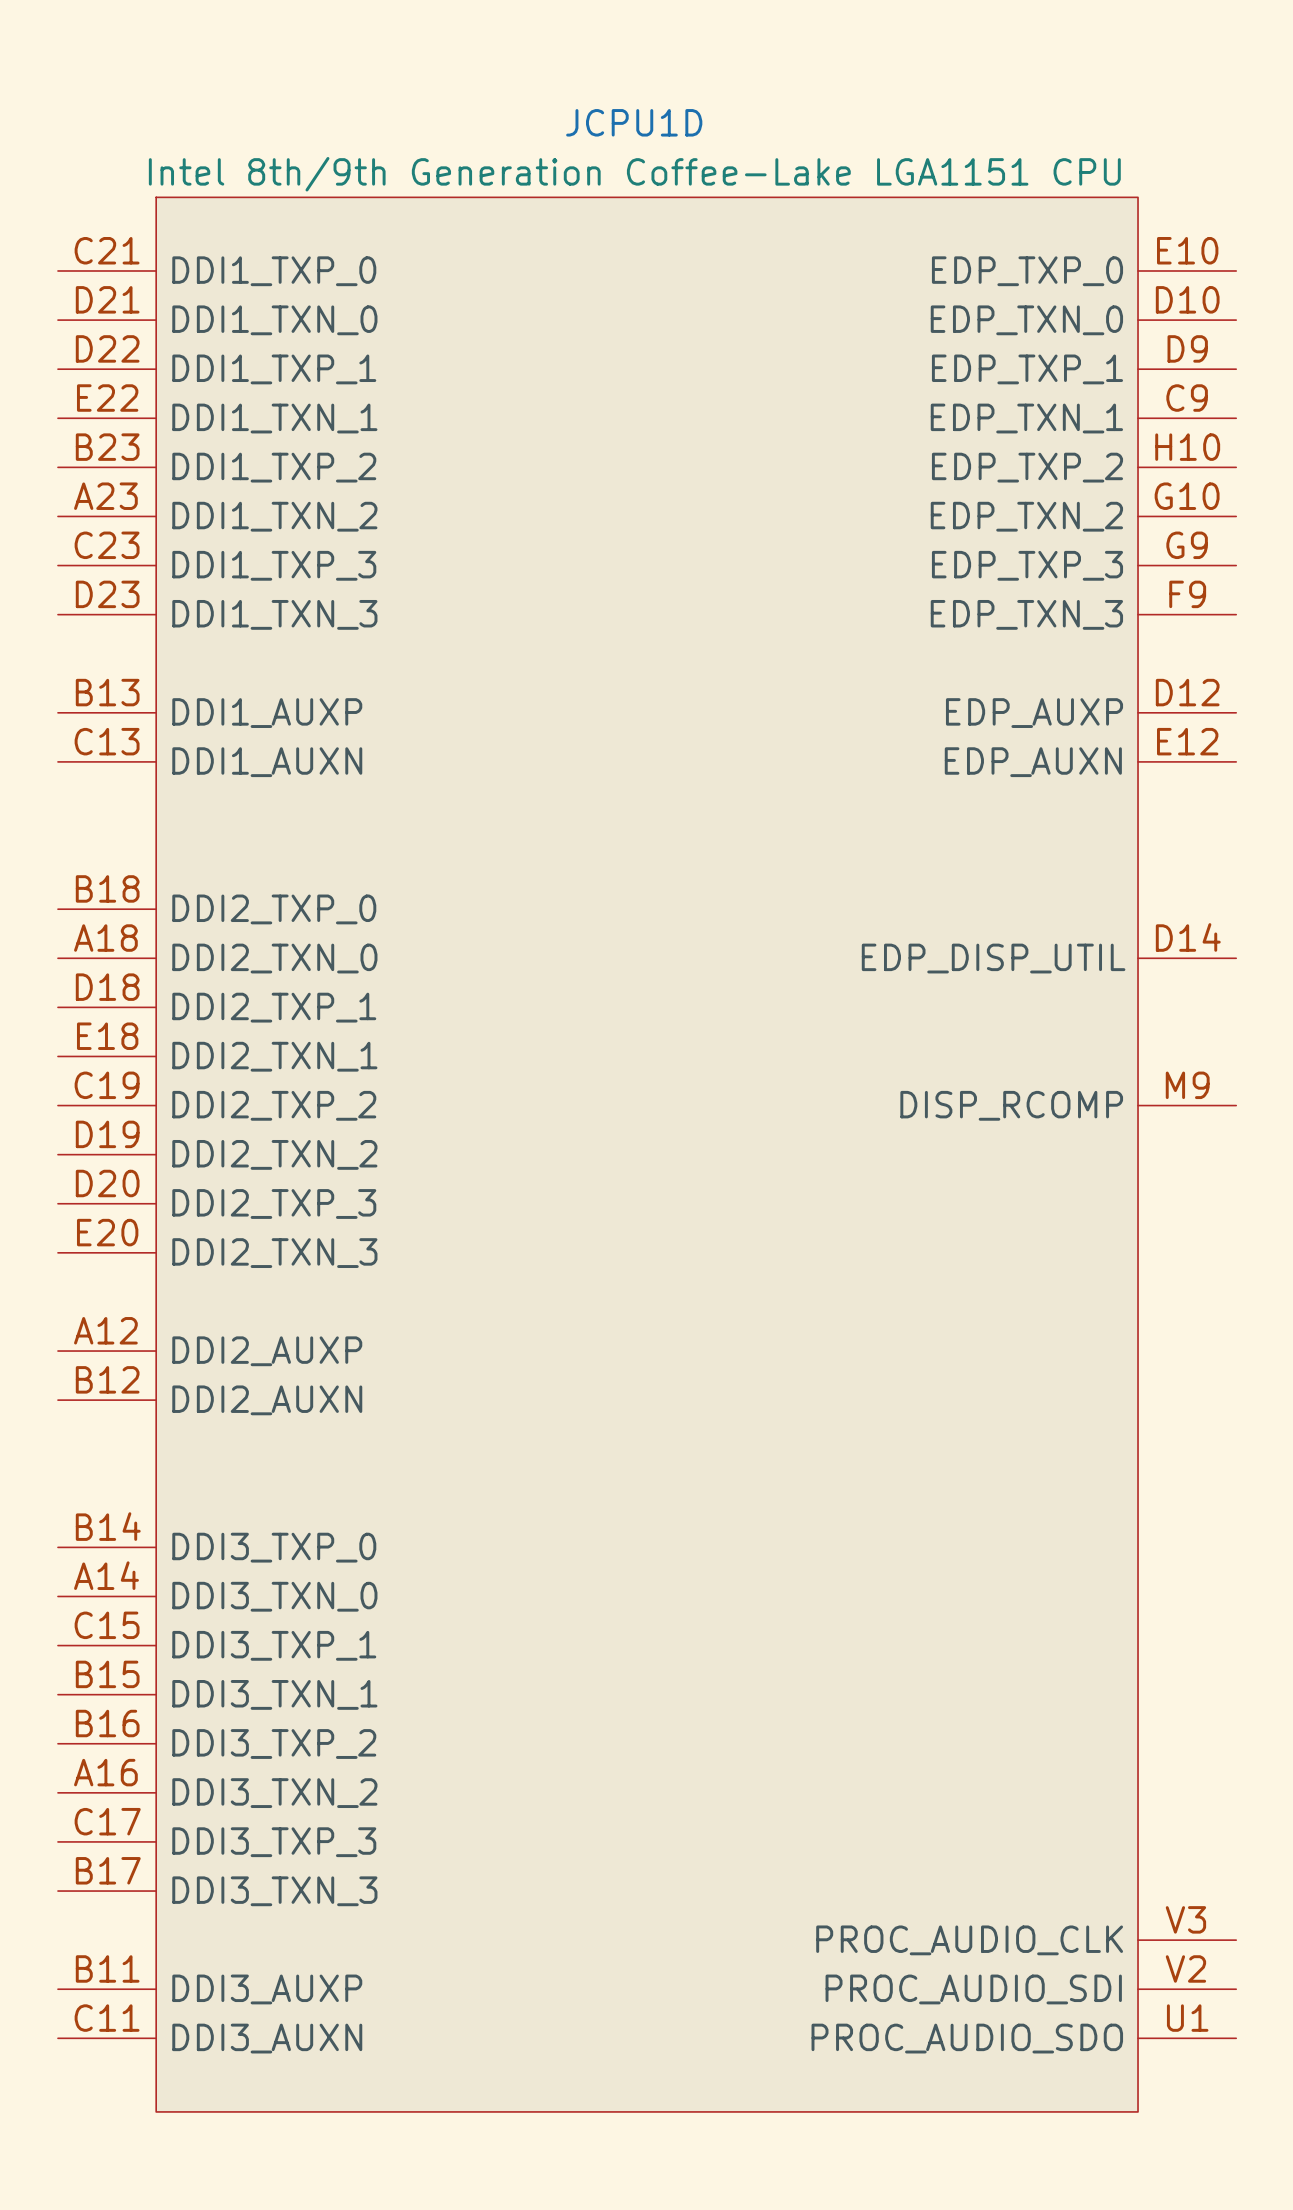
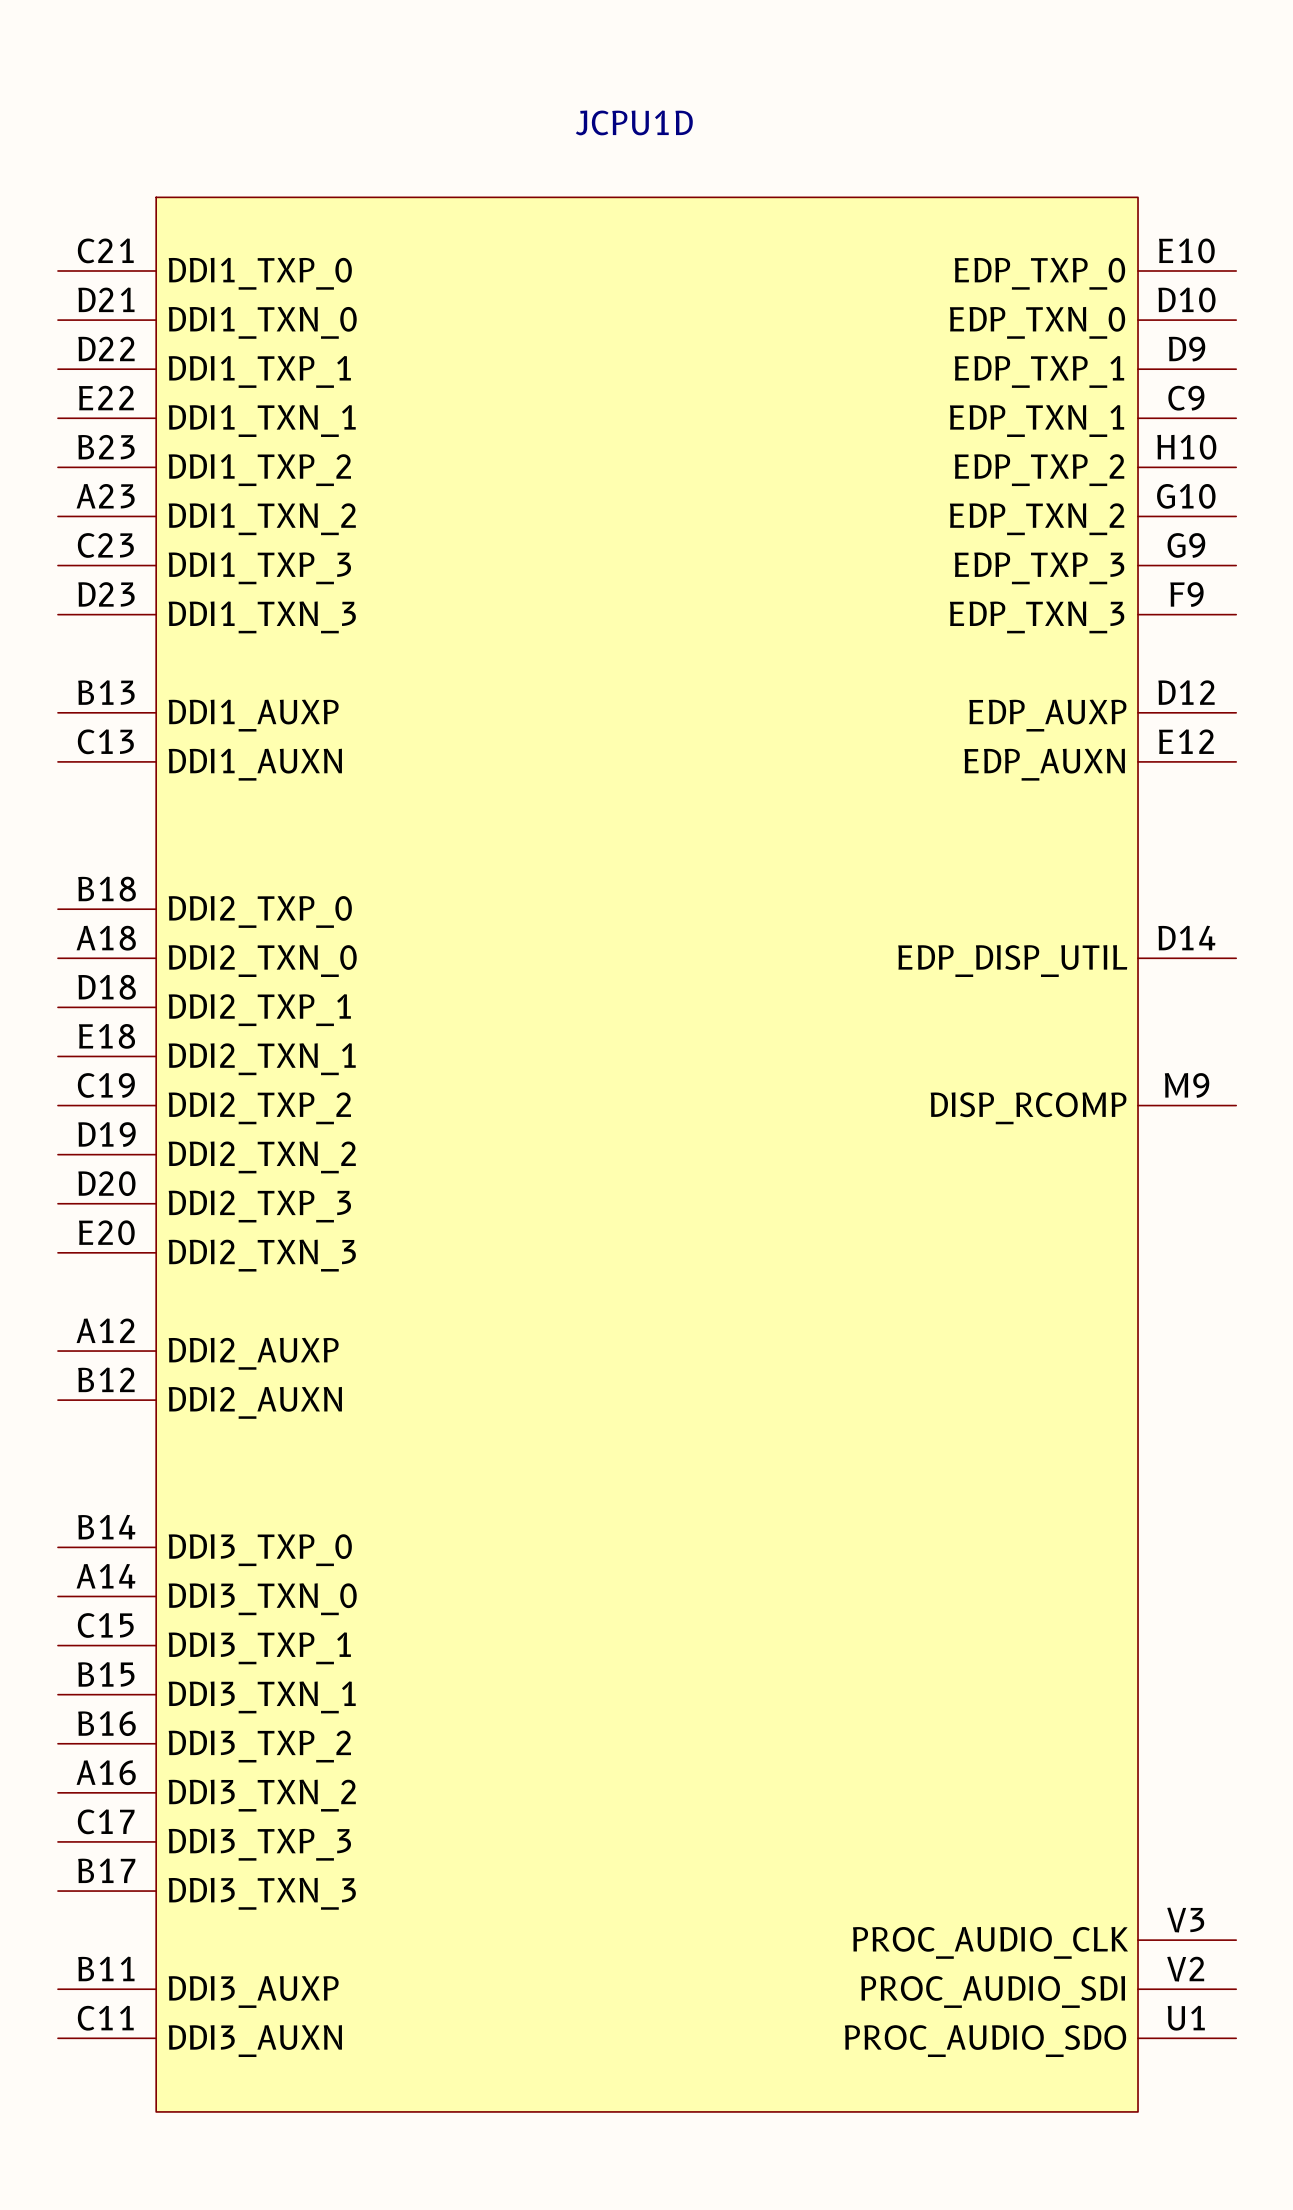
JCPU1D value: Intel 8th/9th Generation Coffee-Lake LGA1151 CPU (634, 174) -> none

